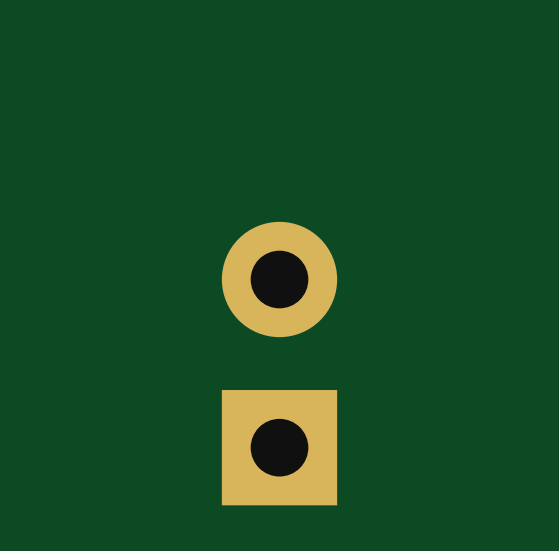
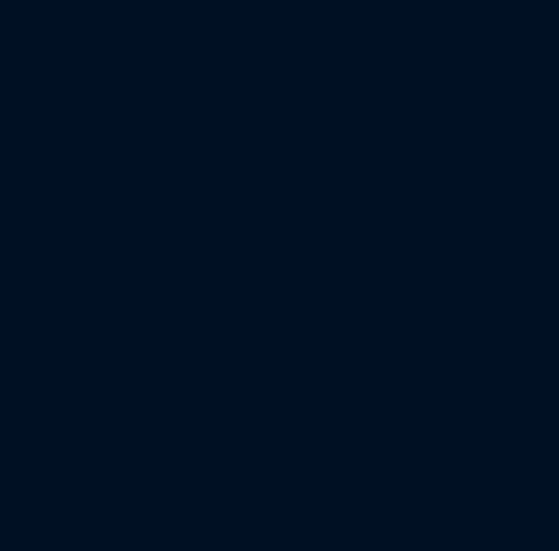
part: (279, 363) -> none

